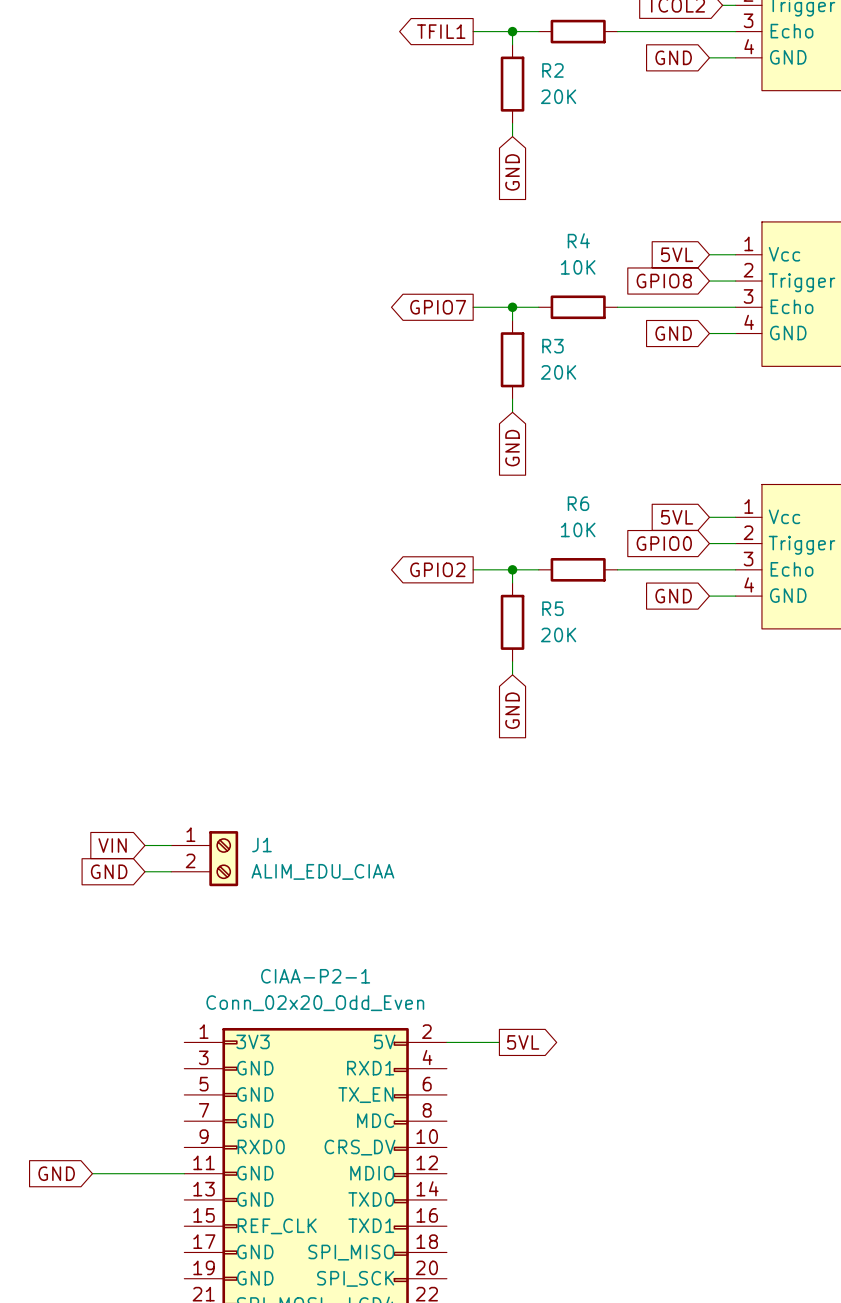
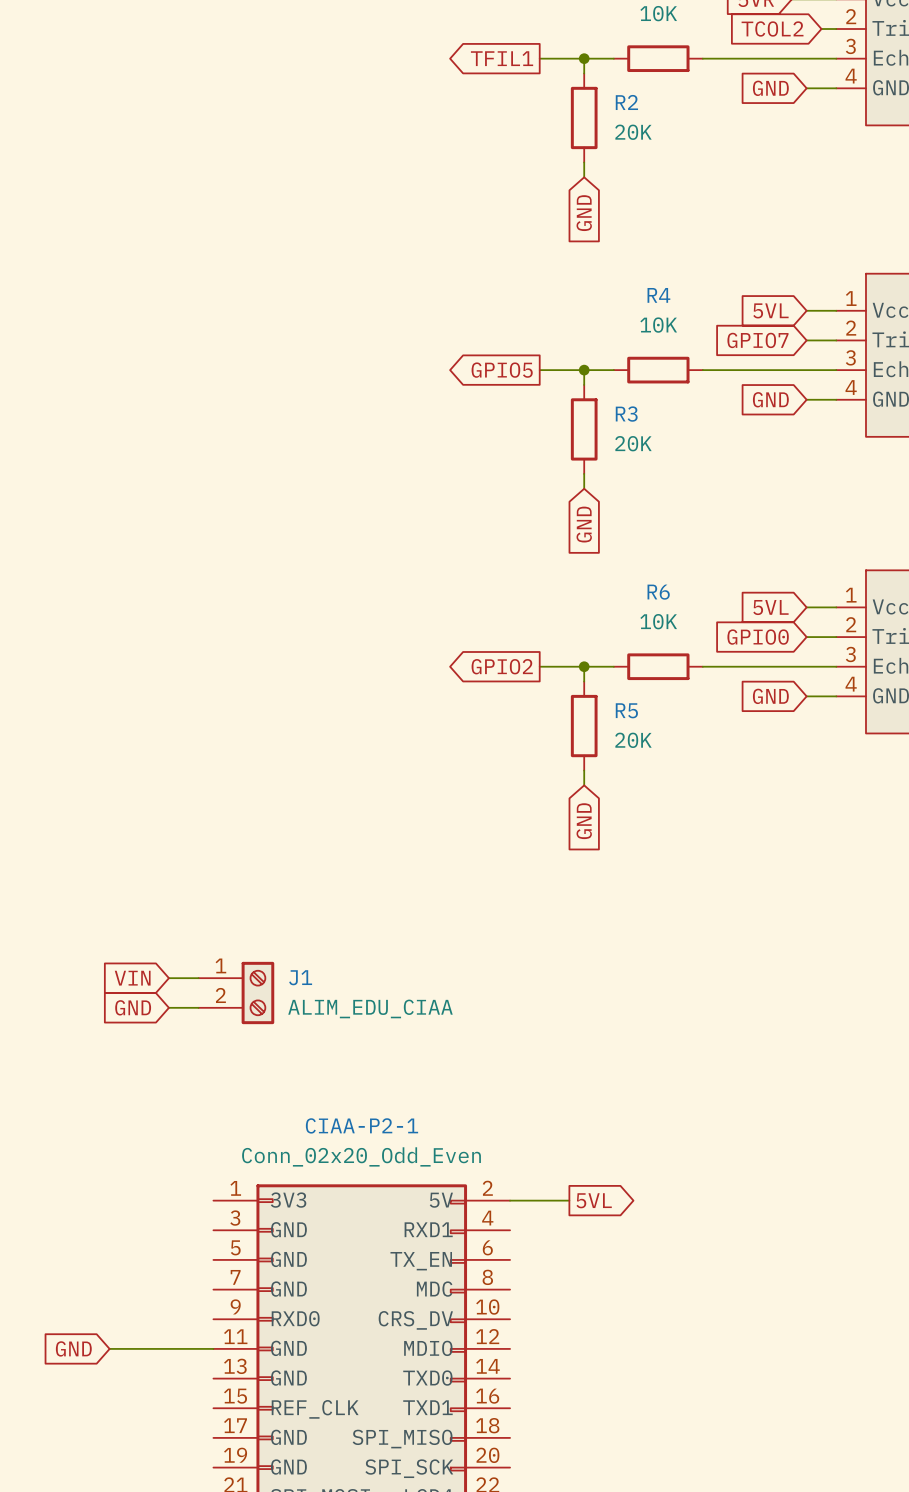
global label: GPIO8 (664, 281) -> GPIO7 (757, 340)
global label: GPIO7 (438, 307) -> GPIO5 (502, 370)

